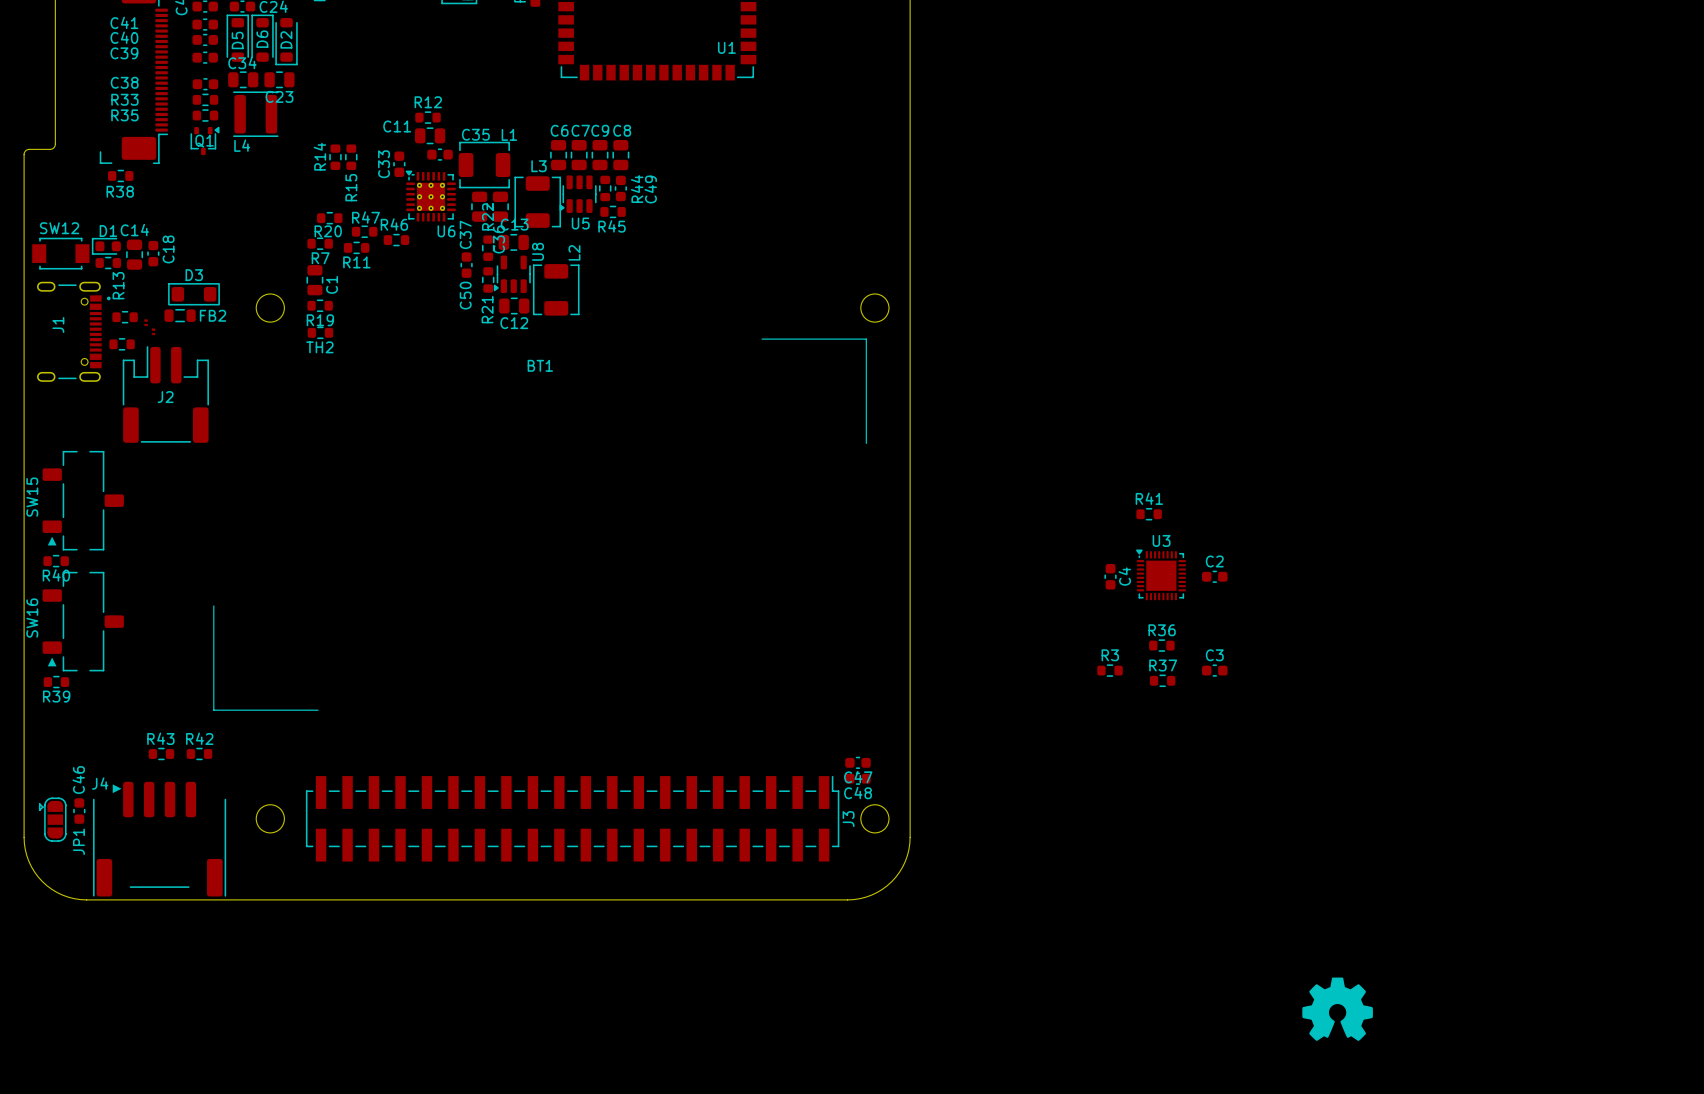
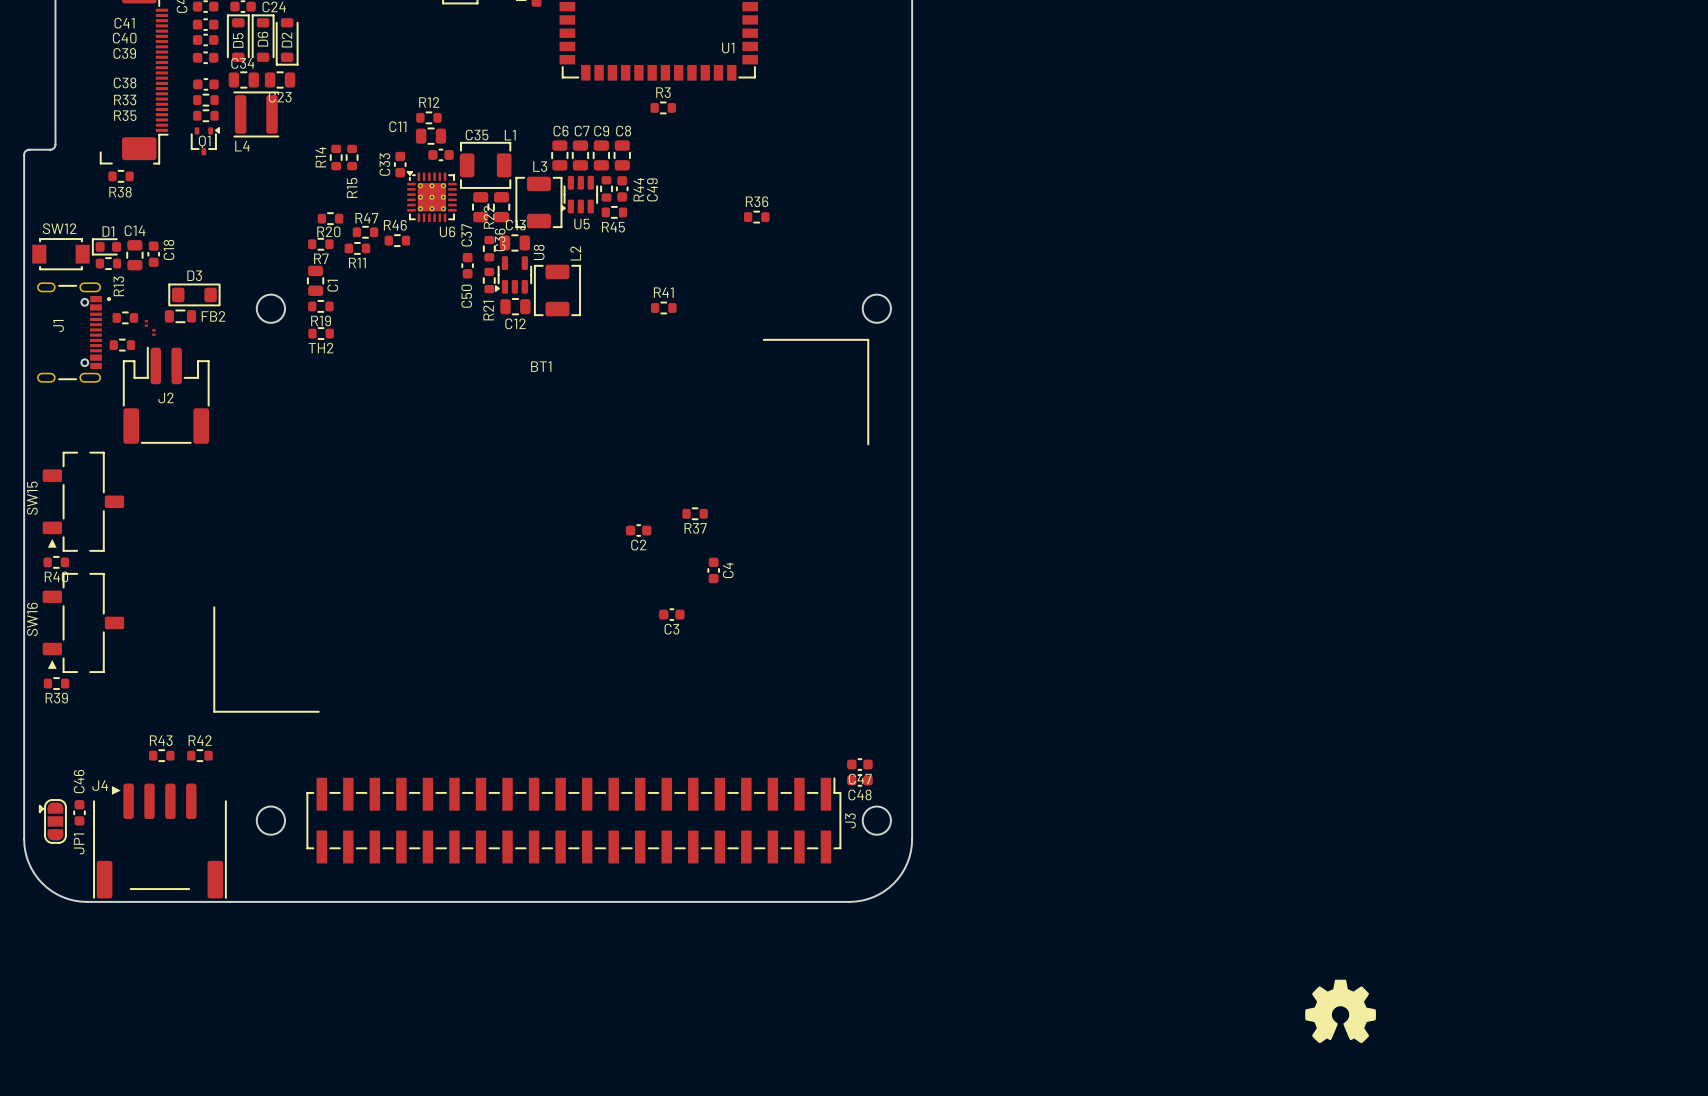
R41 footprint: [1136, 507, 1162, 521] -> [650, 301, 677, 315]
C2 name position: C2 (1214, 561) -> C2 (638, 545)
C2 footprint: [1202, 570, 1228, 583] -> [625, 524, 652, 537]
U3: (1160, 574) -> none
C4 position: (1110, 576) -> (713, 570)
R36 position: (1161, 645) -> (756, 217)
C3 name position: C3 (1214, 655) -> C3 (671, 629)
R37 name position: R37 (1163, 665) -> R37 (695, 528)
R3 position: (1110, 670) -> (663, 107)
C3 position: (1214, 670) -> (671, 614)
R37 footprint: [1149, 674, 1176, 688] -> [682, 507, 708, 520]

